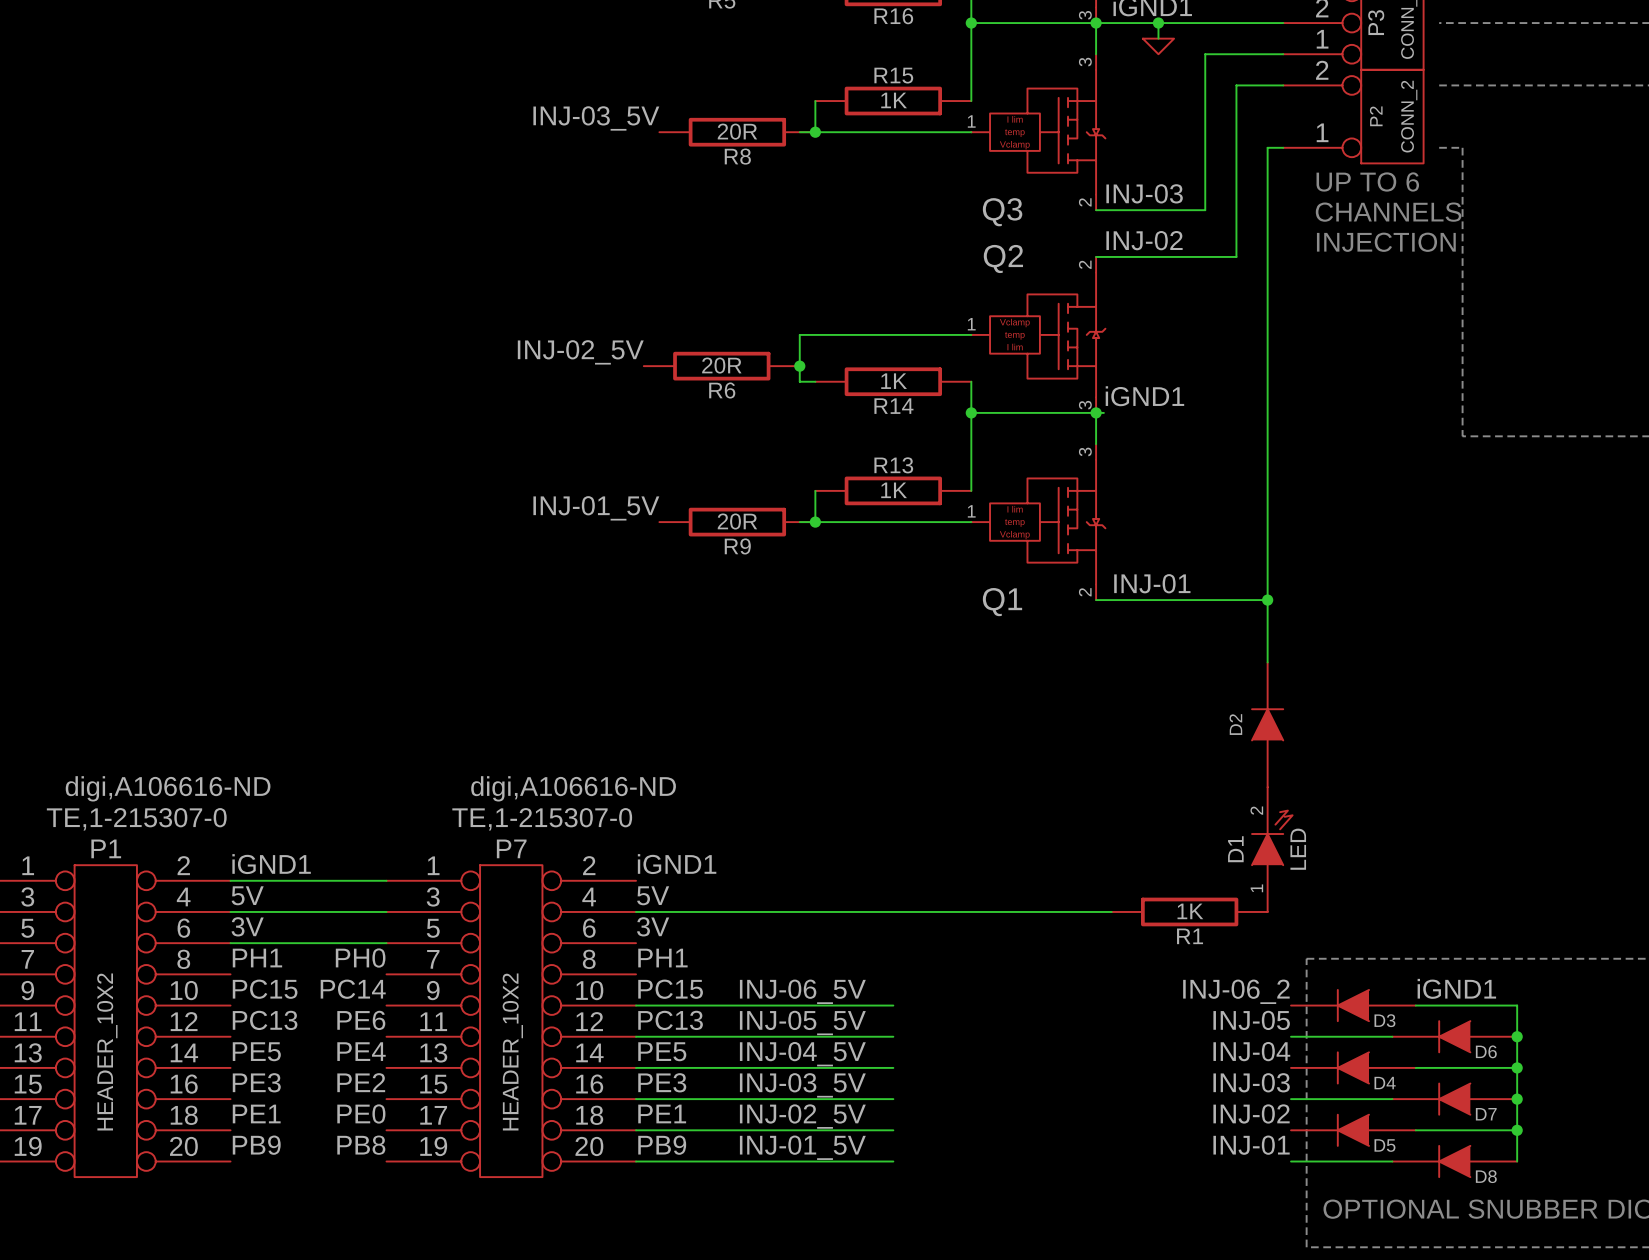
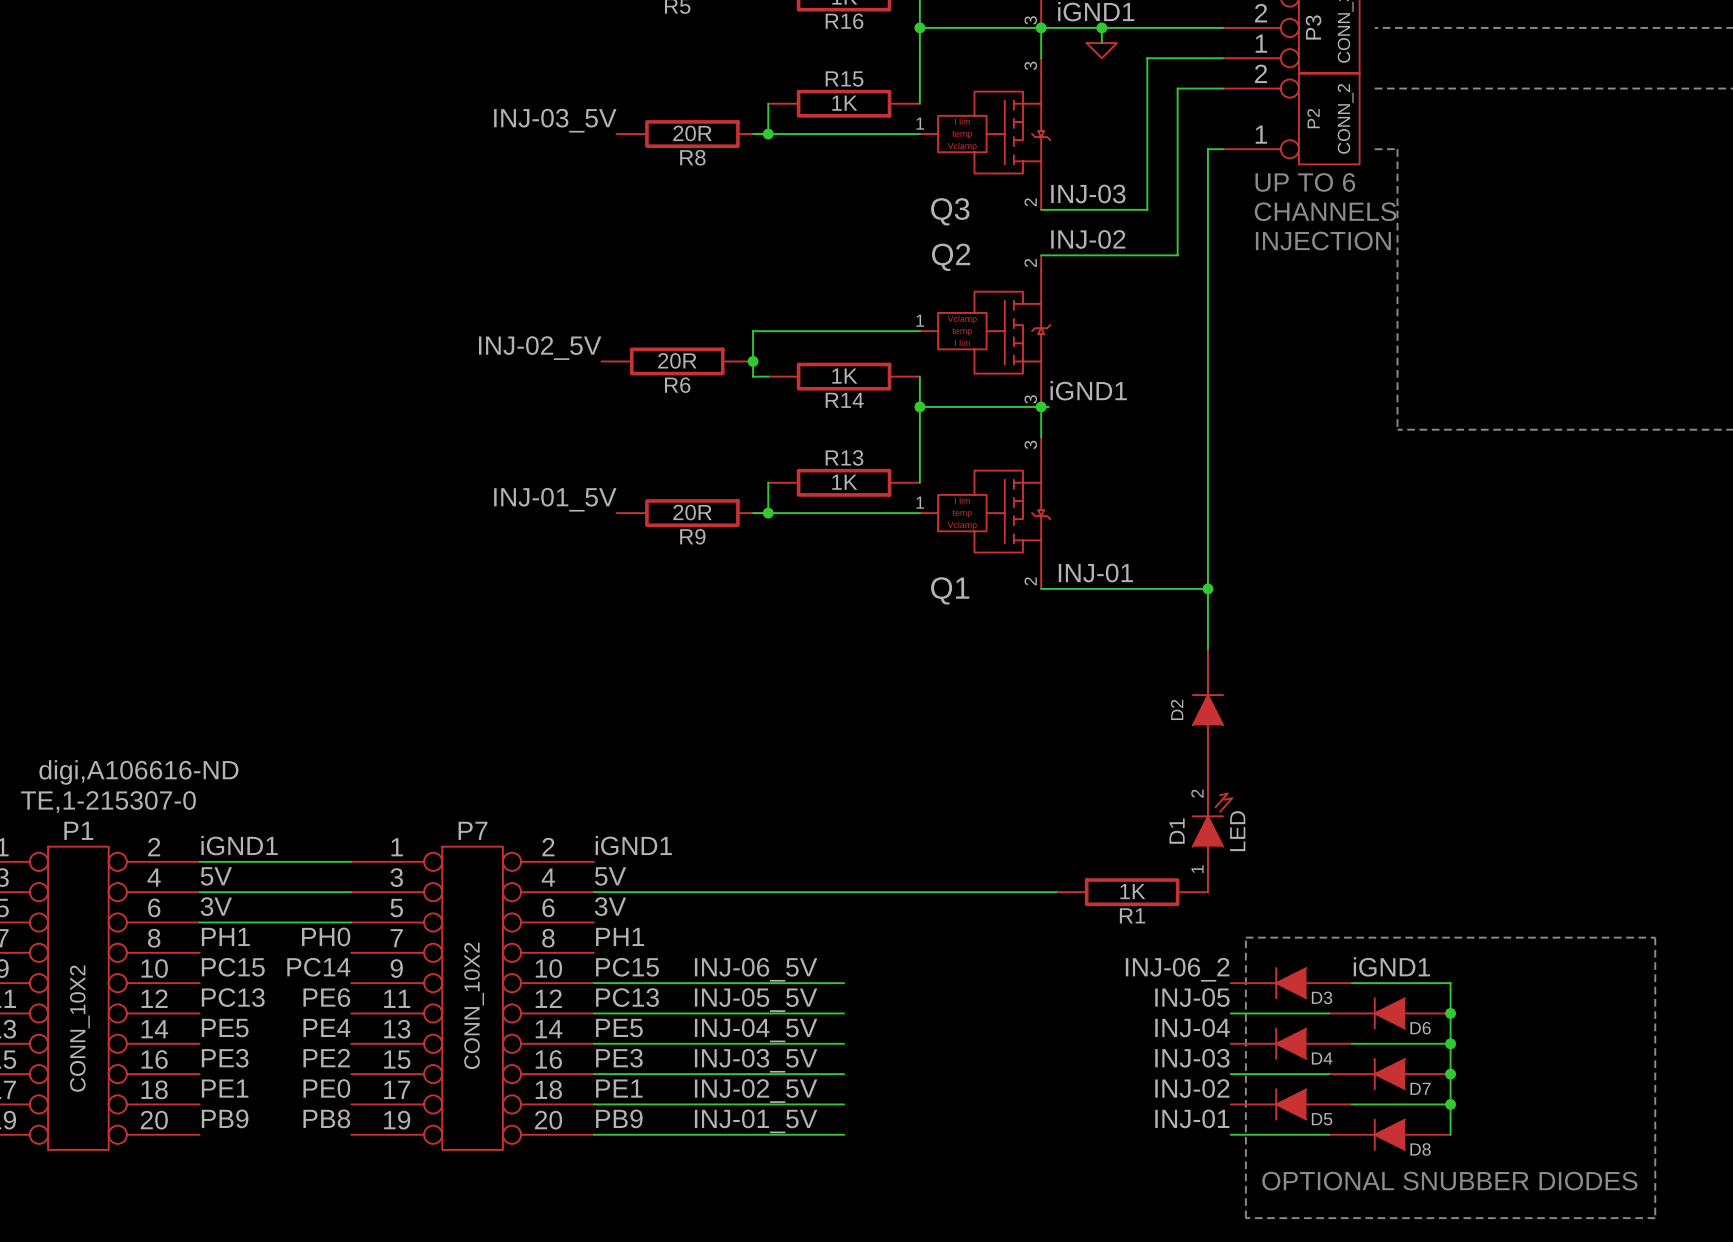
P7 text: digi,A106616-ND (573, 788) -> none
P7 text: TE,1-215307-0 (542, 819) -> none
P1 value: HEADER_10X2 (107, 1051) -> CONN_10X2 (79, 1028)
P7 value: HEADER_10X2 (512, 1051) -> CONN_10X2 (474, 1005)

